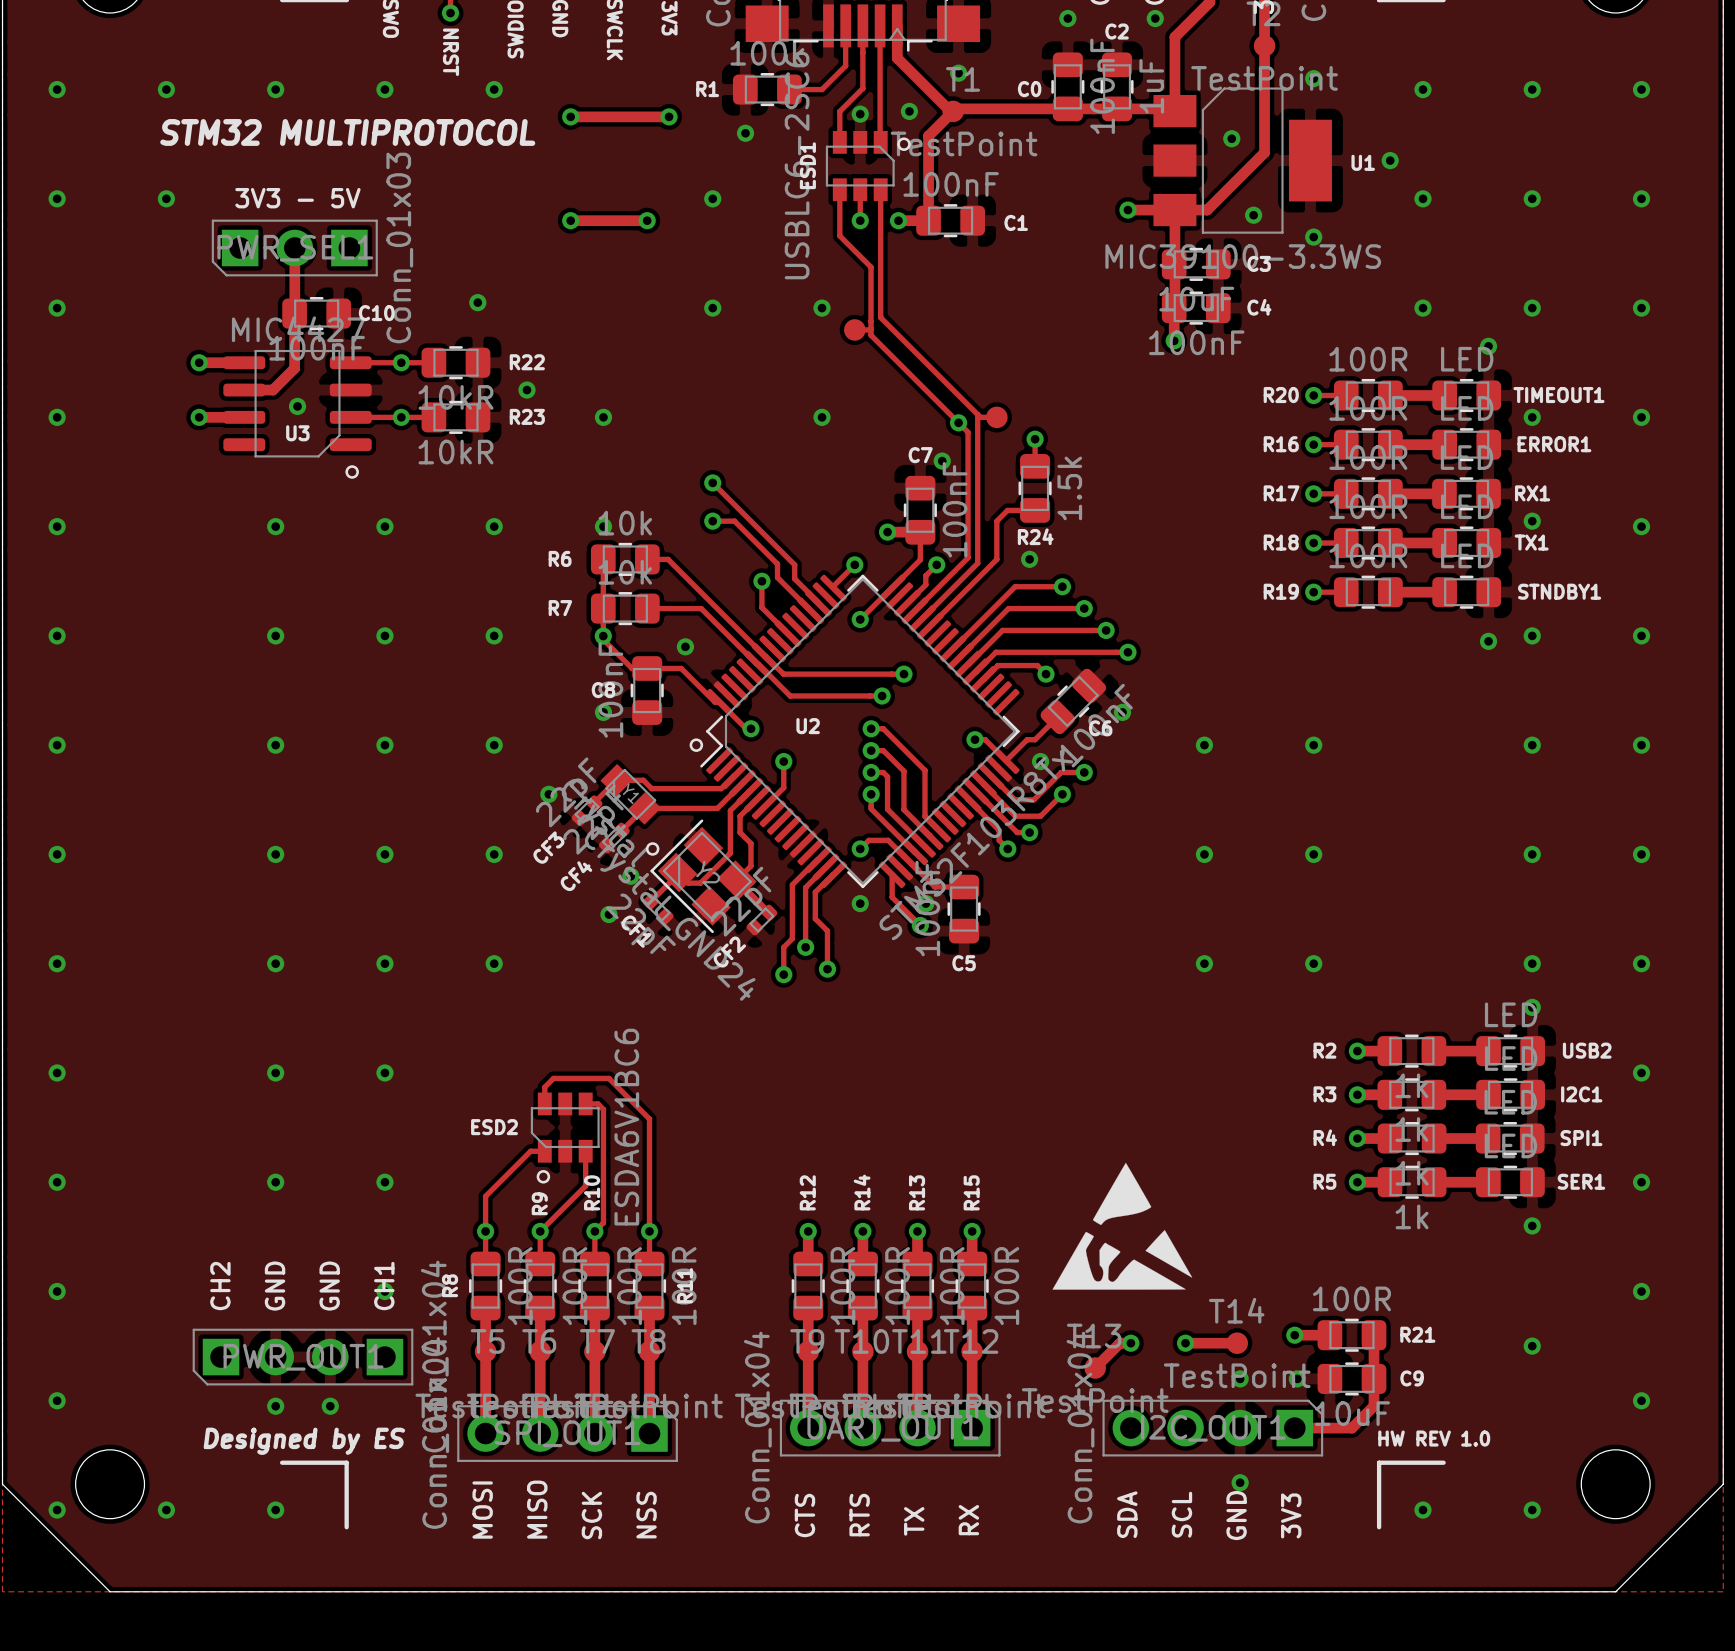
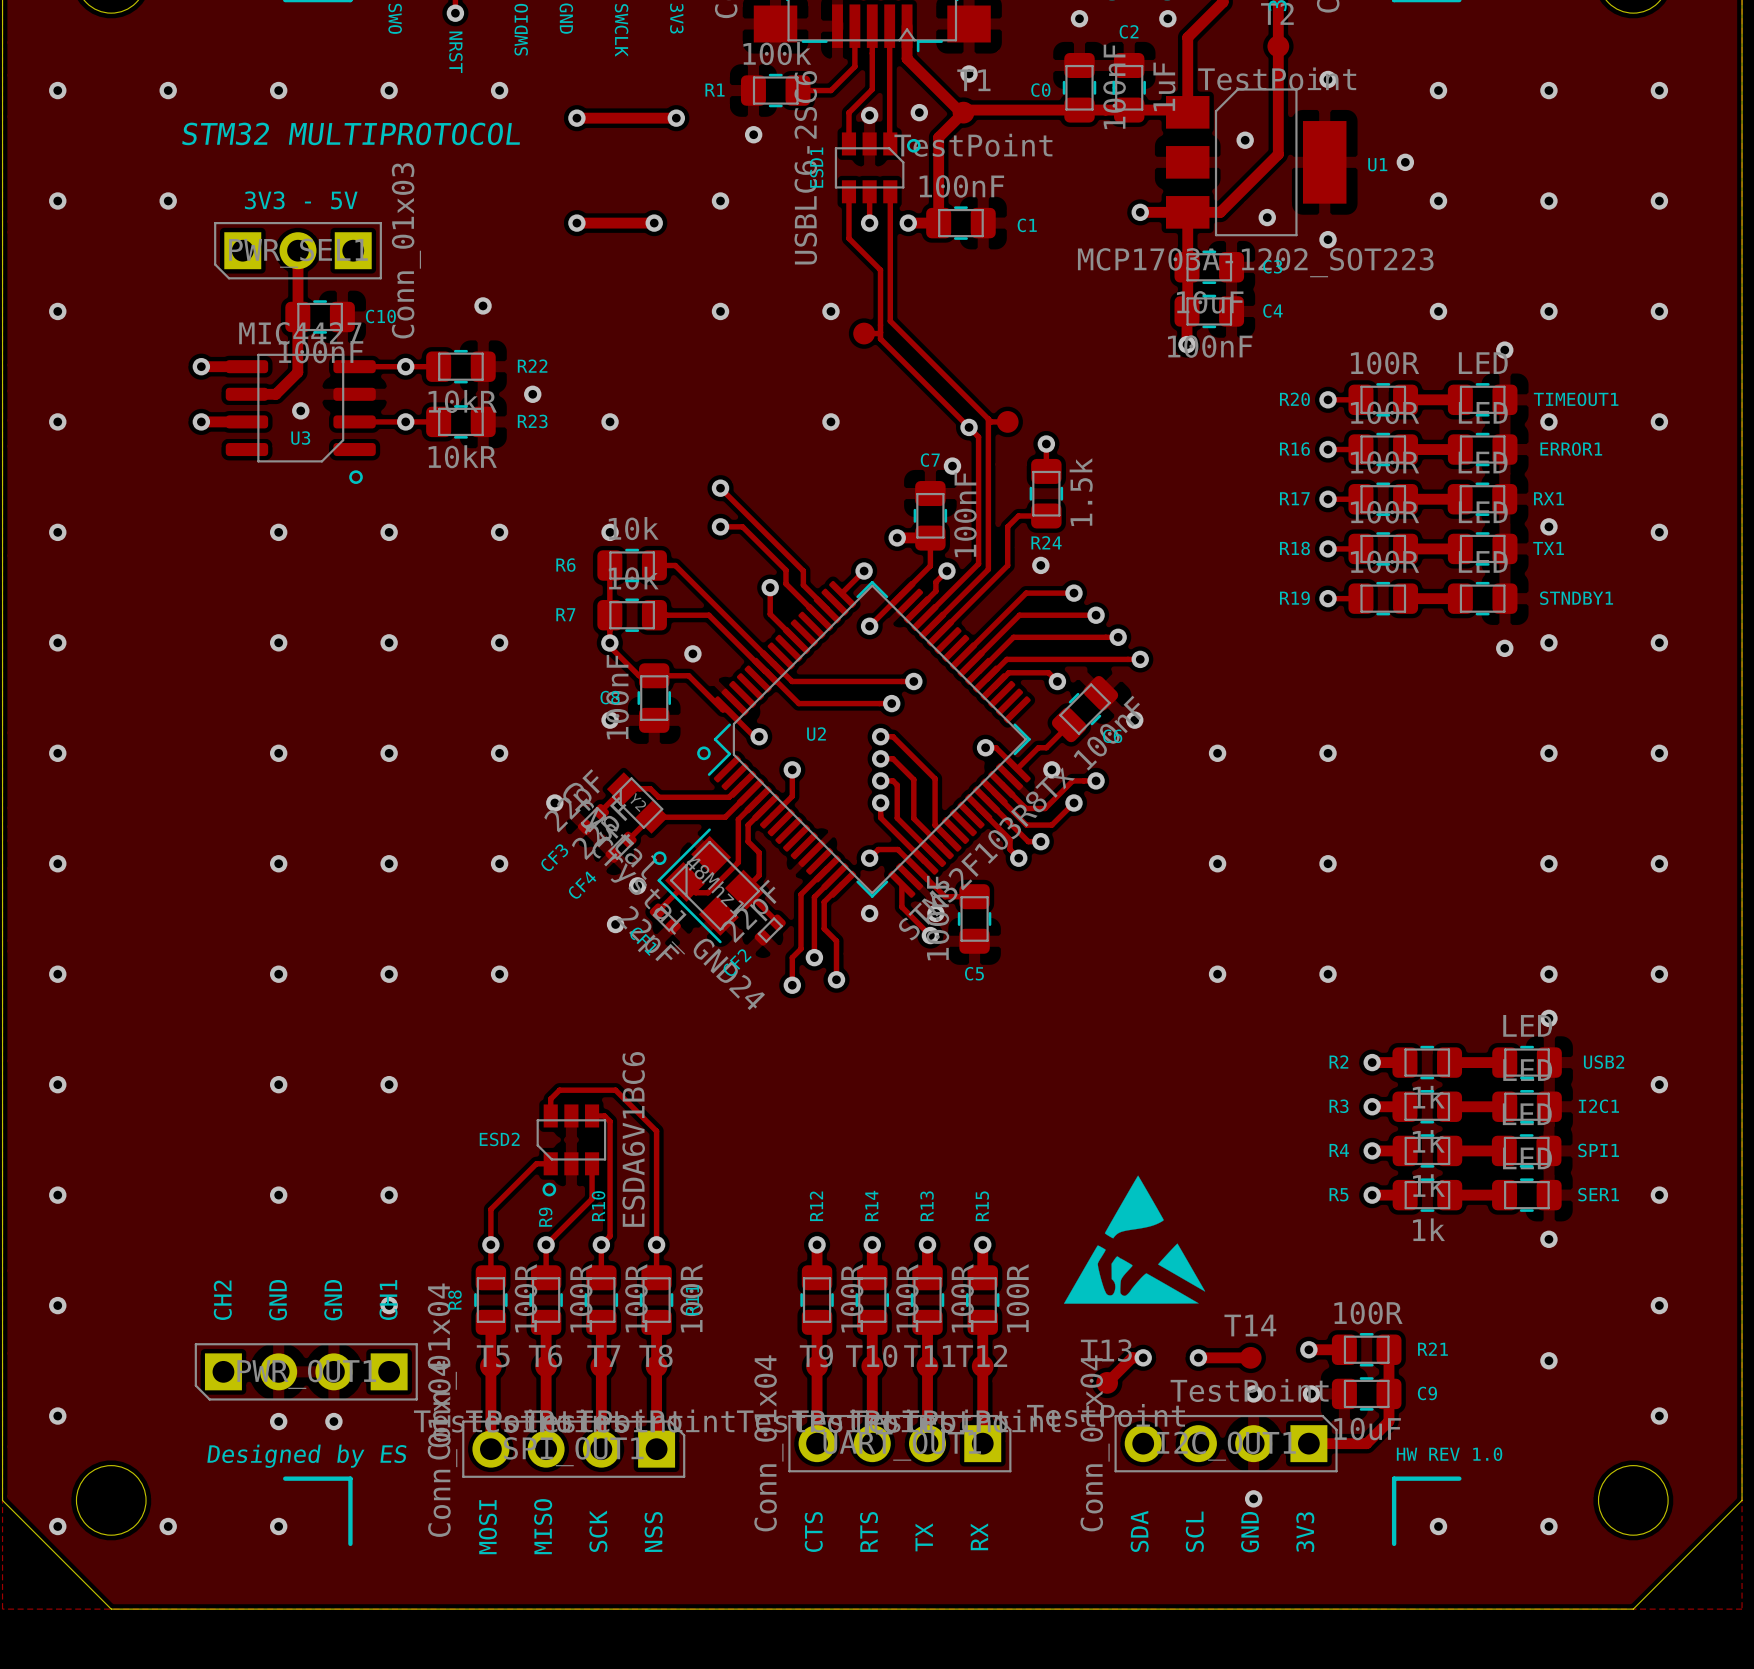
U1 value: MIC39100-3.3WS (1243, 256) -> MCP1703A-1202_SOT223 (1255, 262)
Y1 name: Y1 (630, 793) -> Y2 (638, 802)
Y2 name: Y2 (708, 875) -> 48Mhz1 (715, 887)

